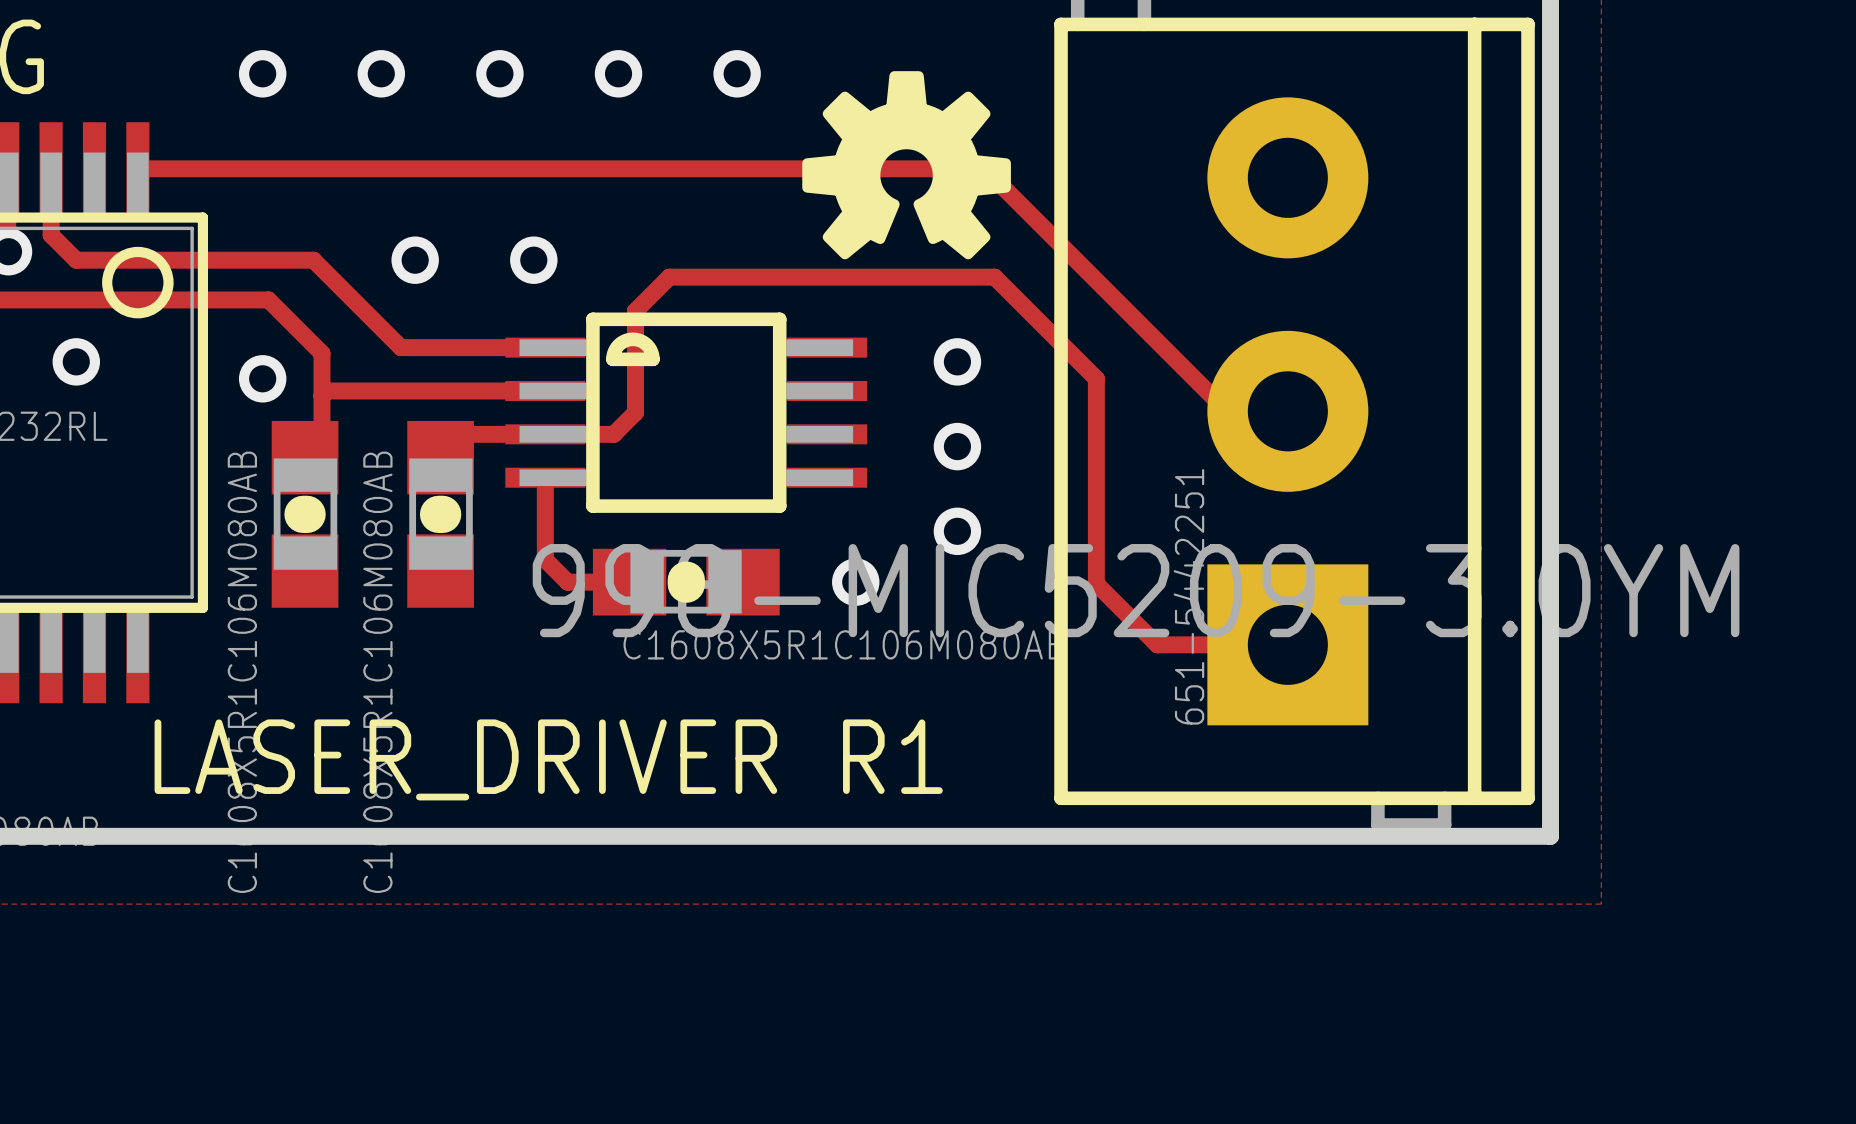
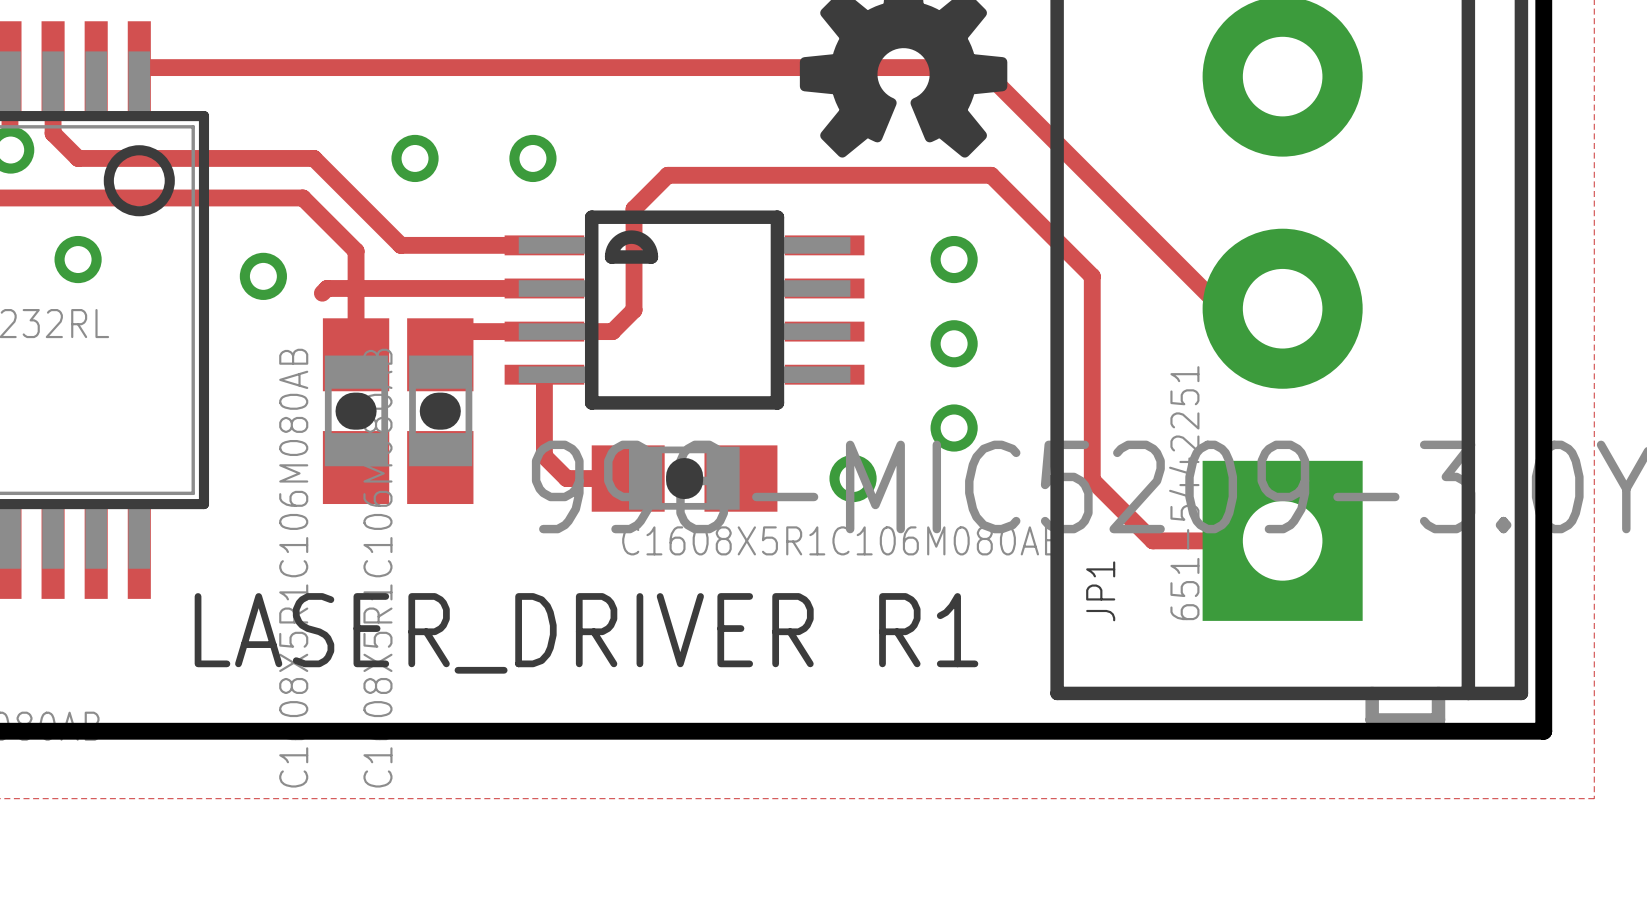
track: (268, 299) (321, 353) (321, 457) (305, 457) -> (269, 197) (302, 197) (356, 251) (356, 354)
part position: (305, 514) -> (356, 411)
JP1 name: none -> JP1 (1100, 591)
text position: LASER_DRIVER R1 (548, 759) -> LASER_DRIVER R1 (586, 633)

